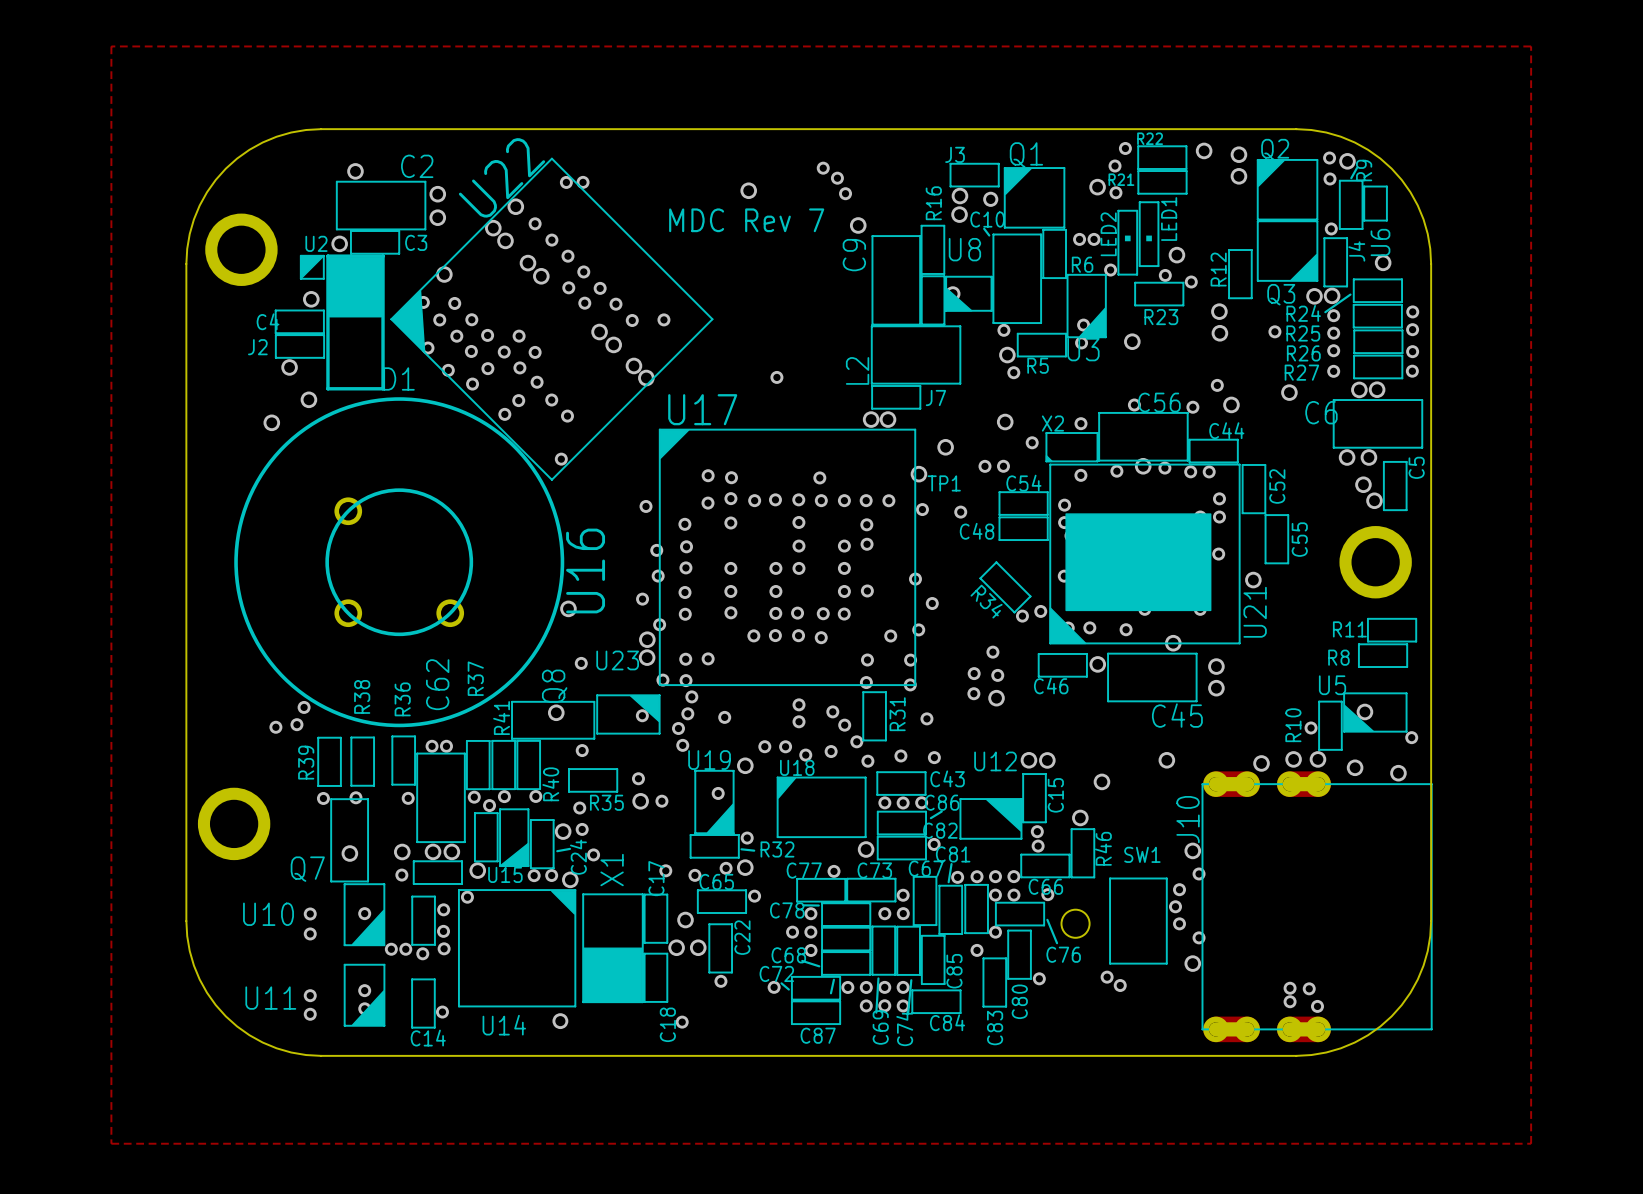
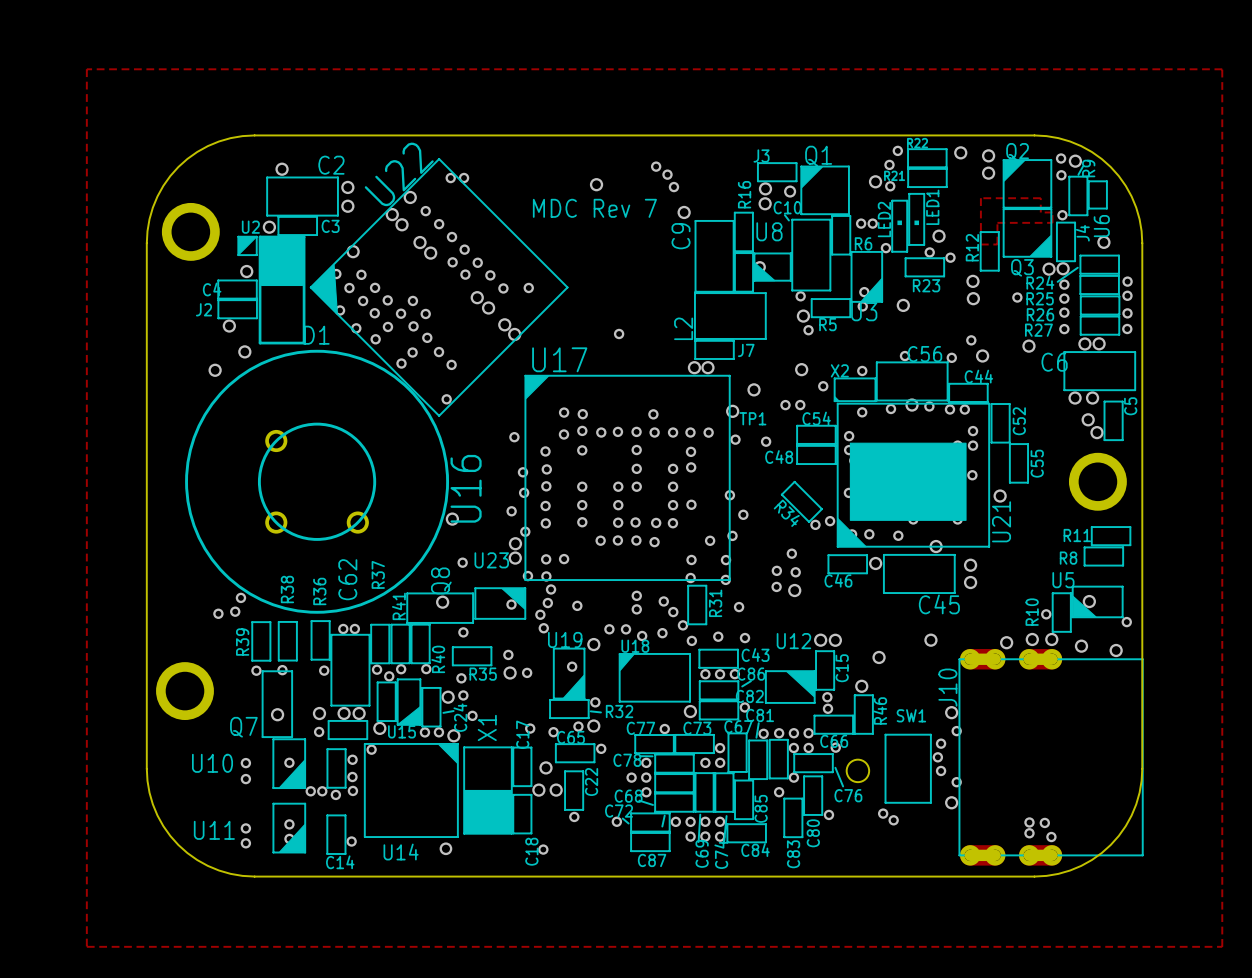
zone outline: none -> (980, 198) (1040, 198) (1040, 212) (1052, 212) (1052, 222) (997, 222) (997, 244) (980, 244) (980, 198)

